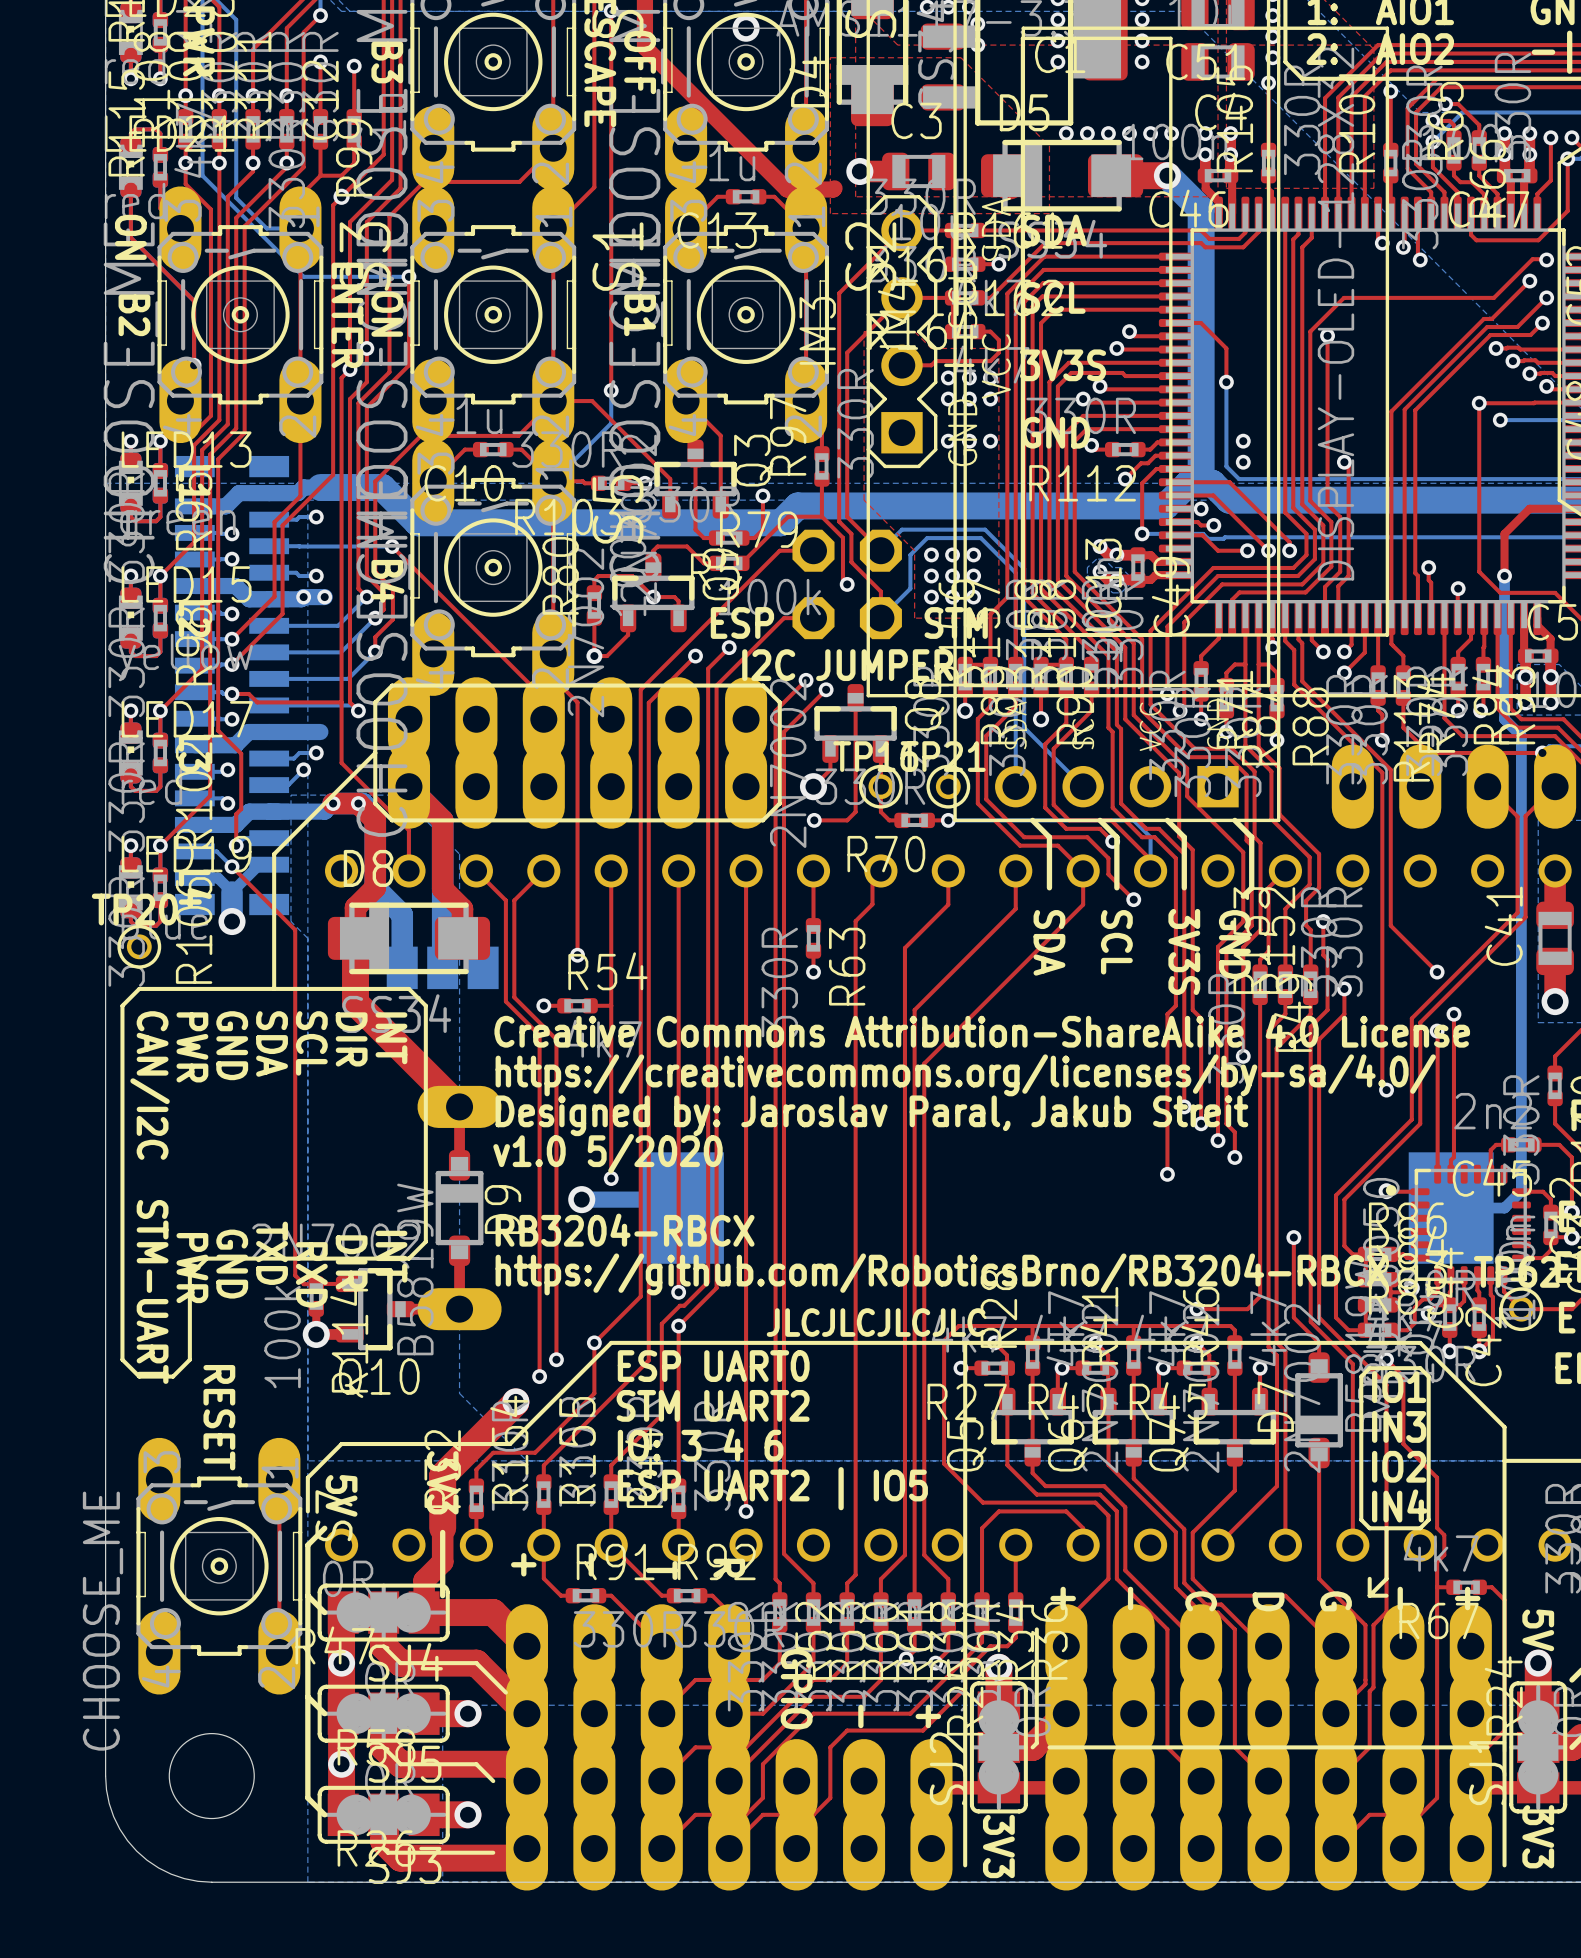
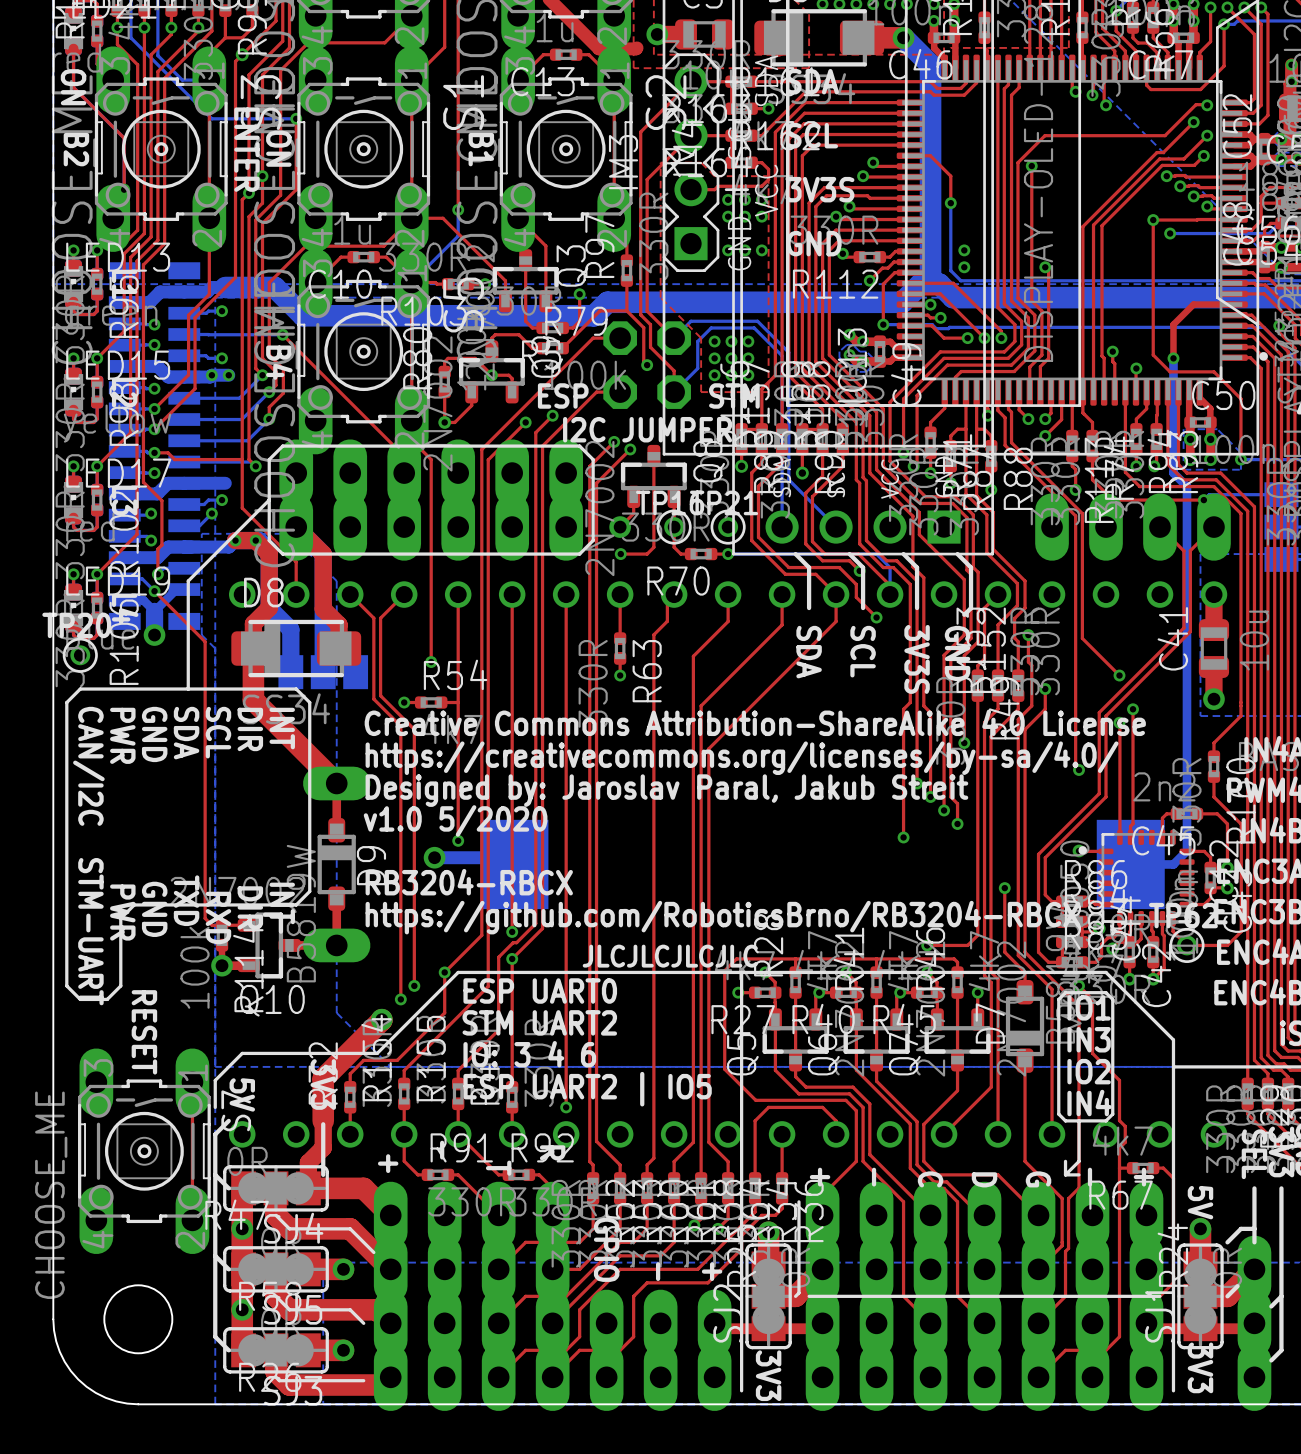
text position: + (523, 1564) -> + (388, 1163)
text position: T (661, 1570) -> T (498, 1168)

